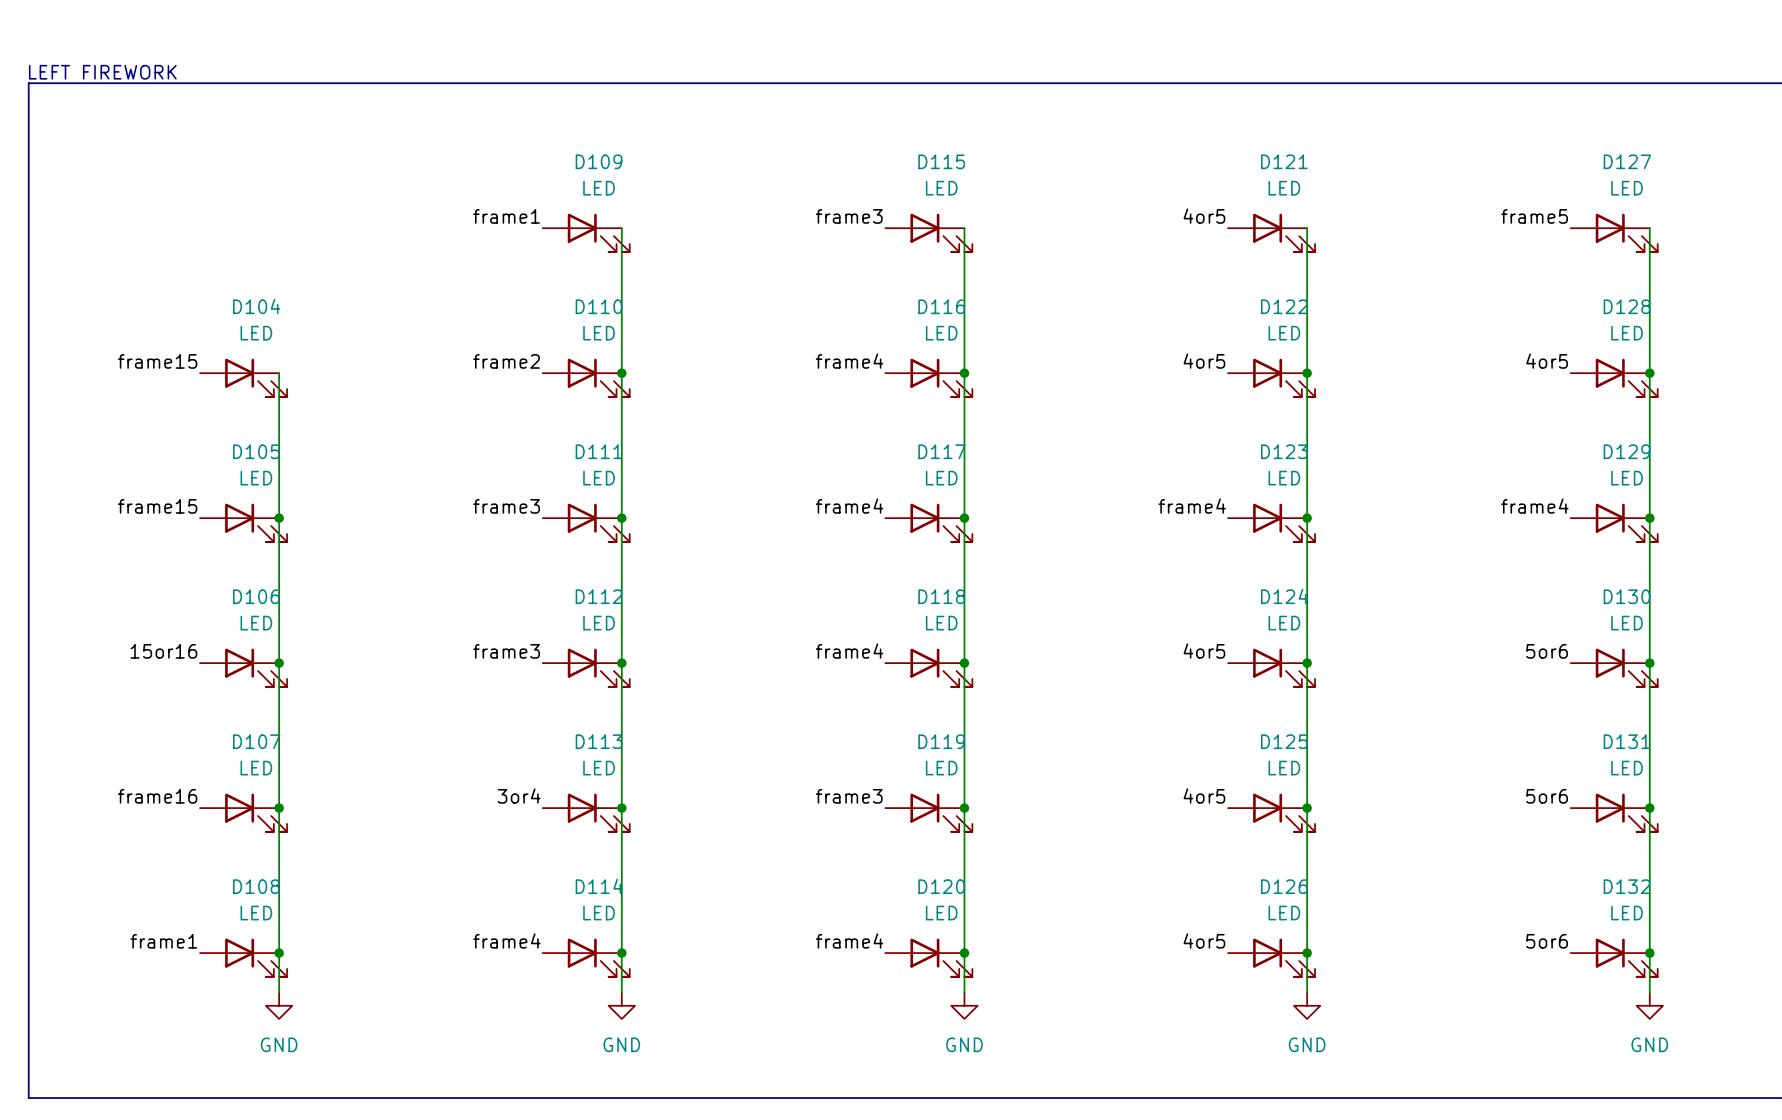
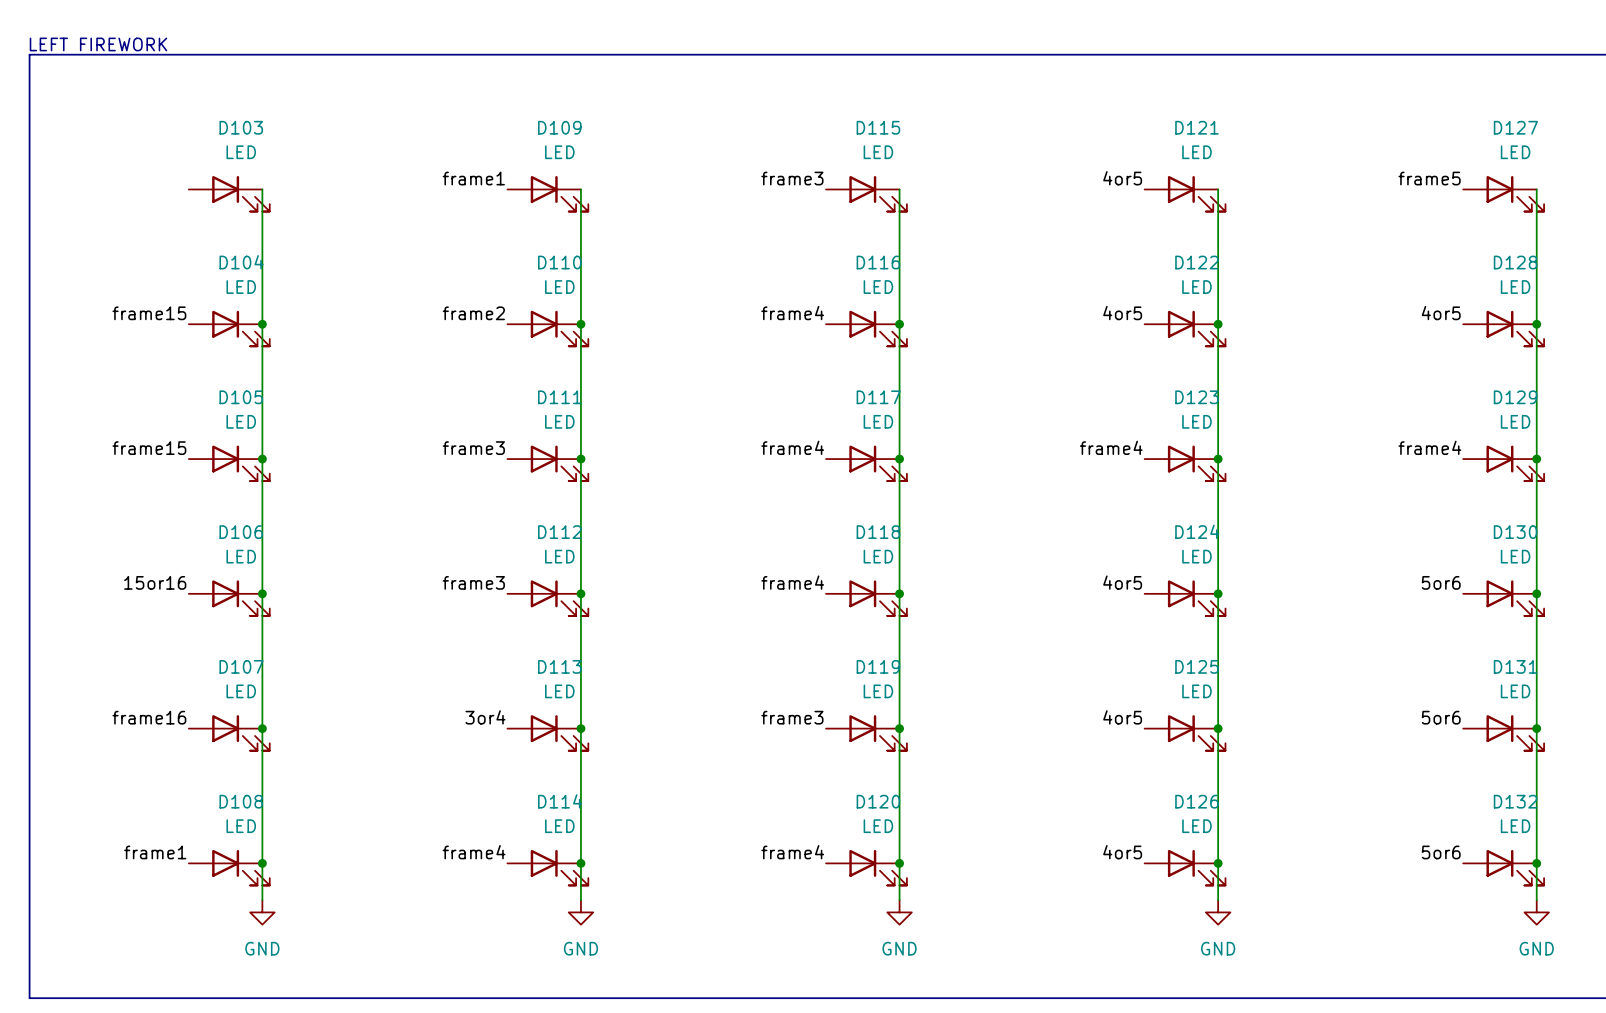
wire: none -> (262, 189) (262, 324)
D103: none -> LED (229, 193)
junction: none -> (262, 324)

